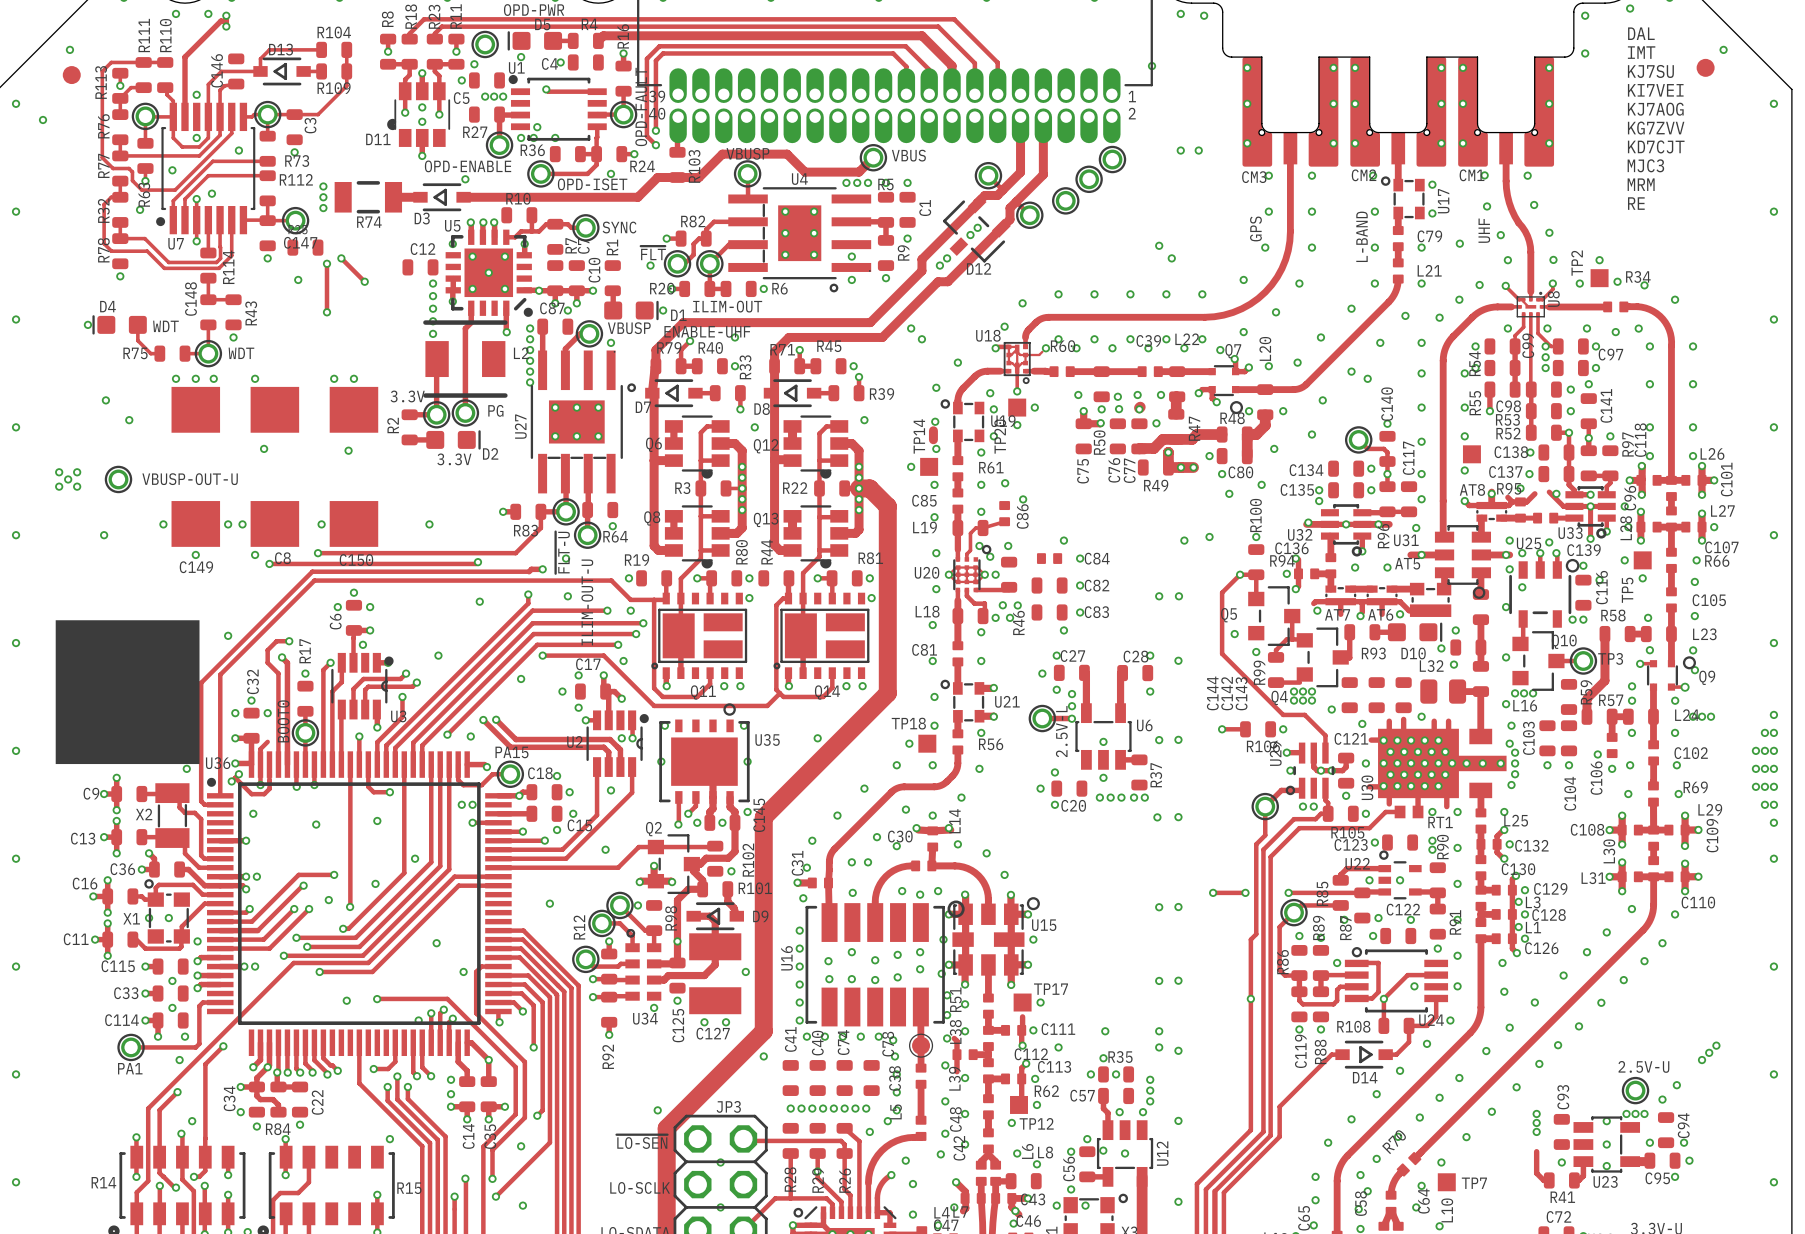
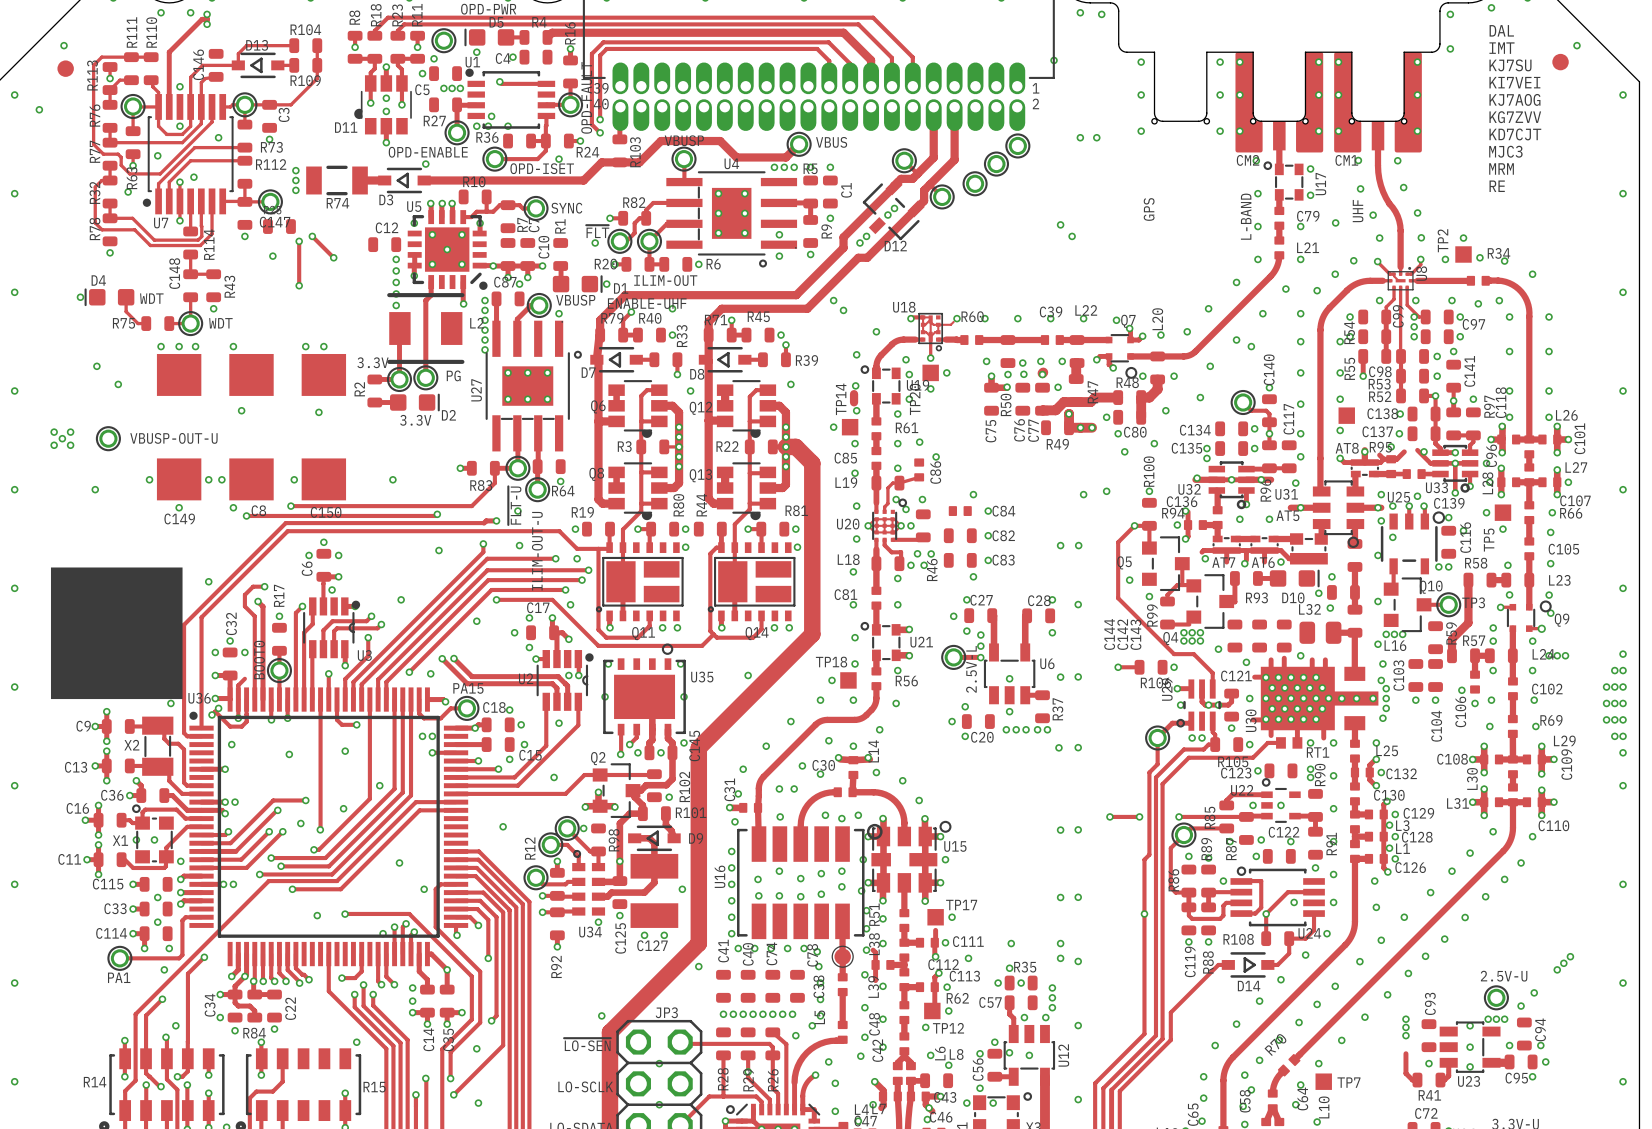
CM3: (1290, 111) -> none
track: (1290, 148) (1290, 231) (1288, 250) (1277, 277) (1258, 298) (1241, 308) (1214, 316) (1043, 317) (1037, 321) (1026, 331) (1025, 346) -> none
via: (1268, 175) -> none
via: (1311, 175) -> none
via: (1268, 211) -> none
via: (1311, 211) -> none
via: (1265, 247) -> none
via: (1311, 247) -> none
via: (1243, 279) -> none
via: (1299, 283) -> none
via: (1058, 294) -> none
via: (1094, 294) -> none
via: (1130, 294) -> none
via: (1166, 294) -> none
via: (1202, 294) -> none
via: (1022, 303) -> none
via: (1276, 312) -> none
via: (1004, 326) -> none
via: (1243, 332) -> none
via: (1058, 339) -> none
via: (1094, 339) -> none
via: (1130, 339) -> none
via: (1166, 339) -> none
via: (1202, 339) -> none

